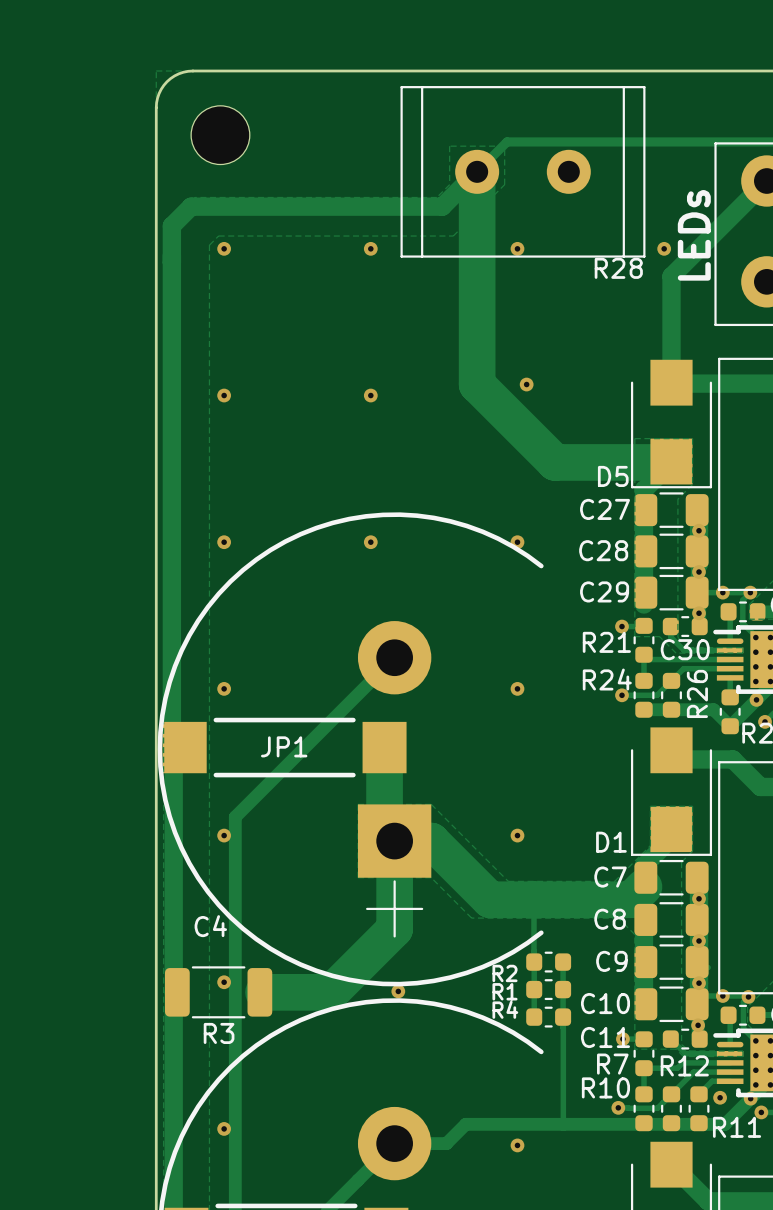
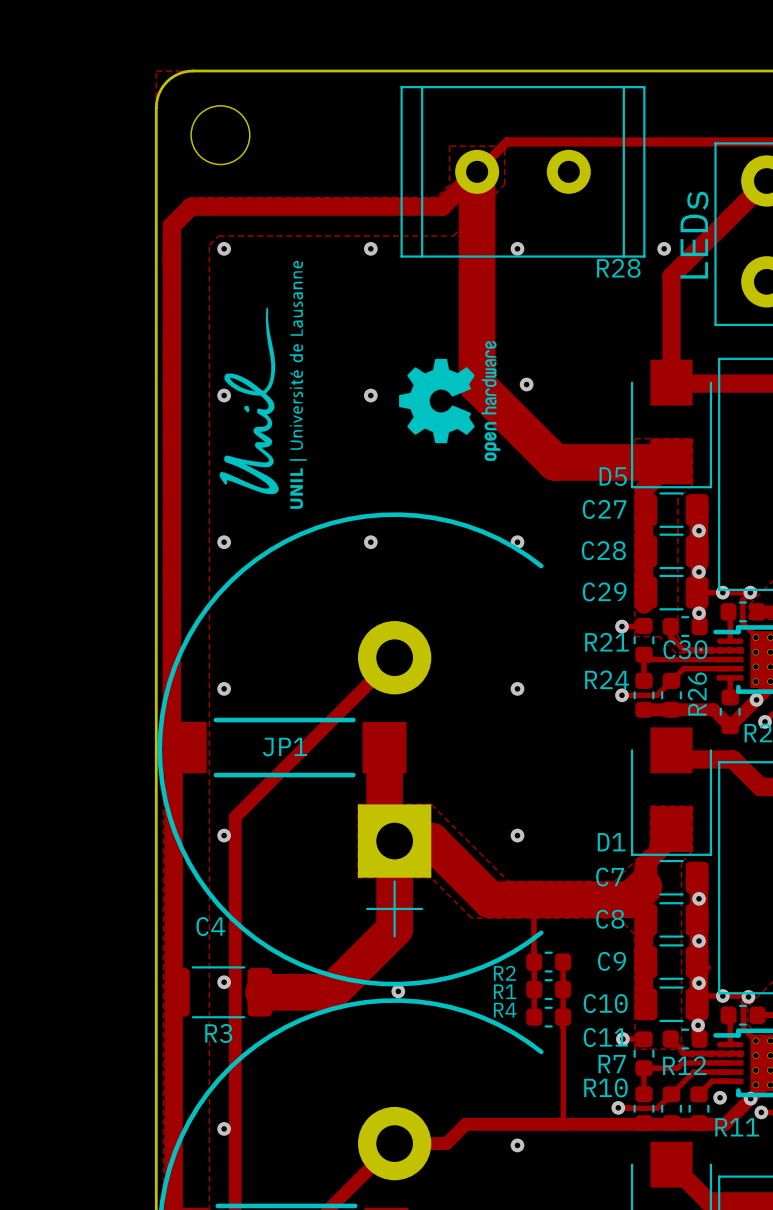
drawing: none -> [219, 260, 308, 509]
drawing: none -> [398, 341, 501, 461]

